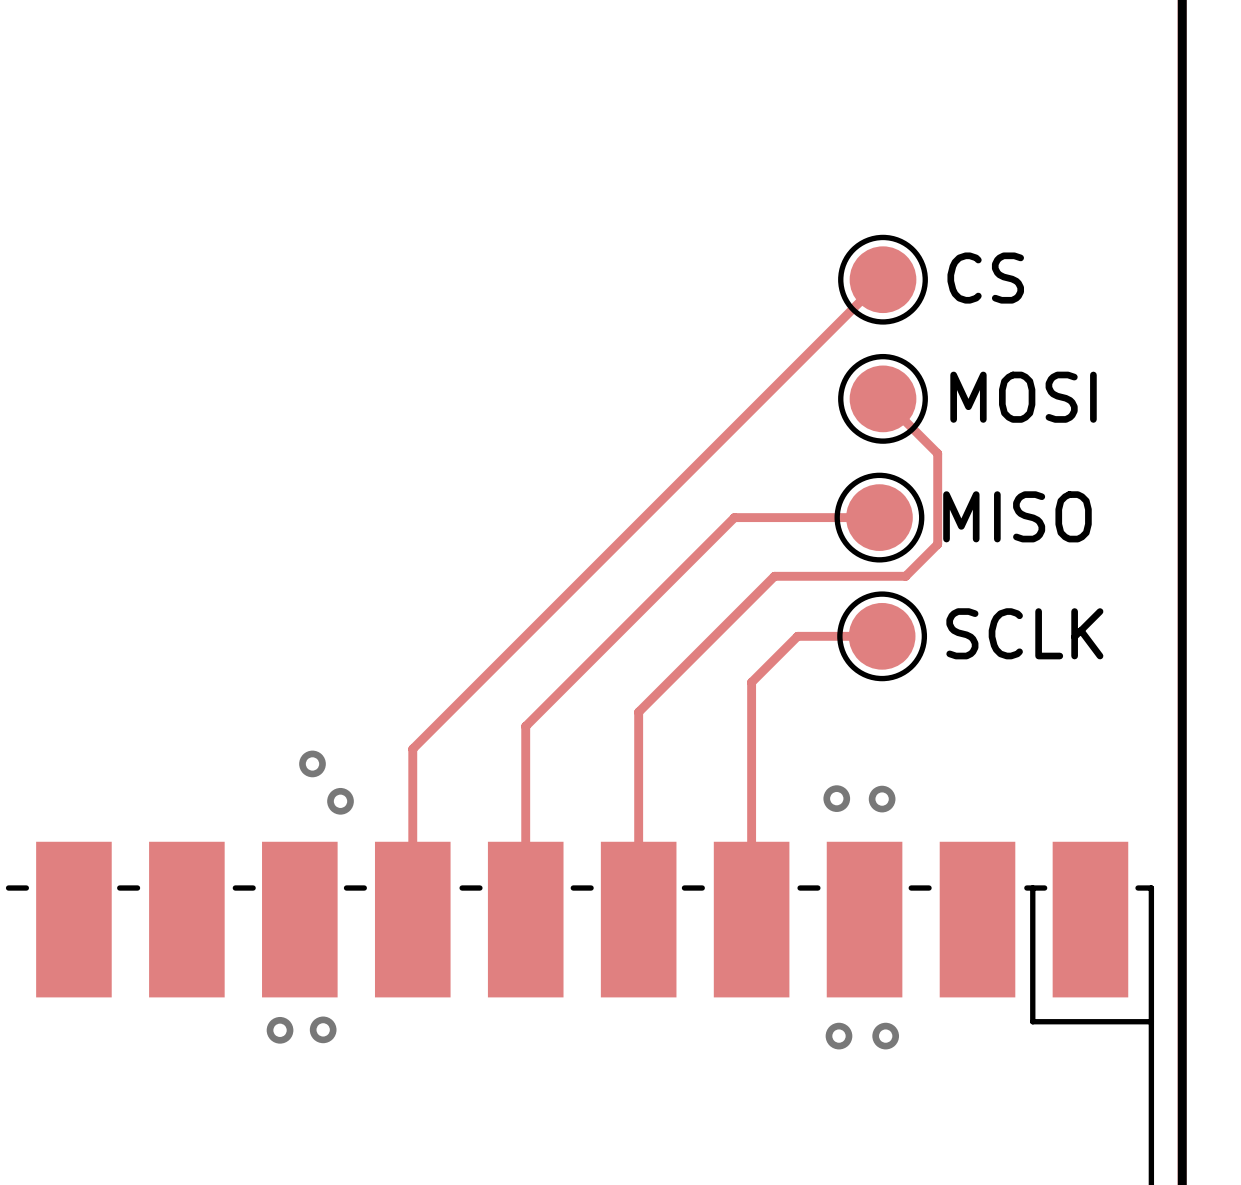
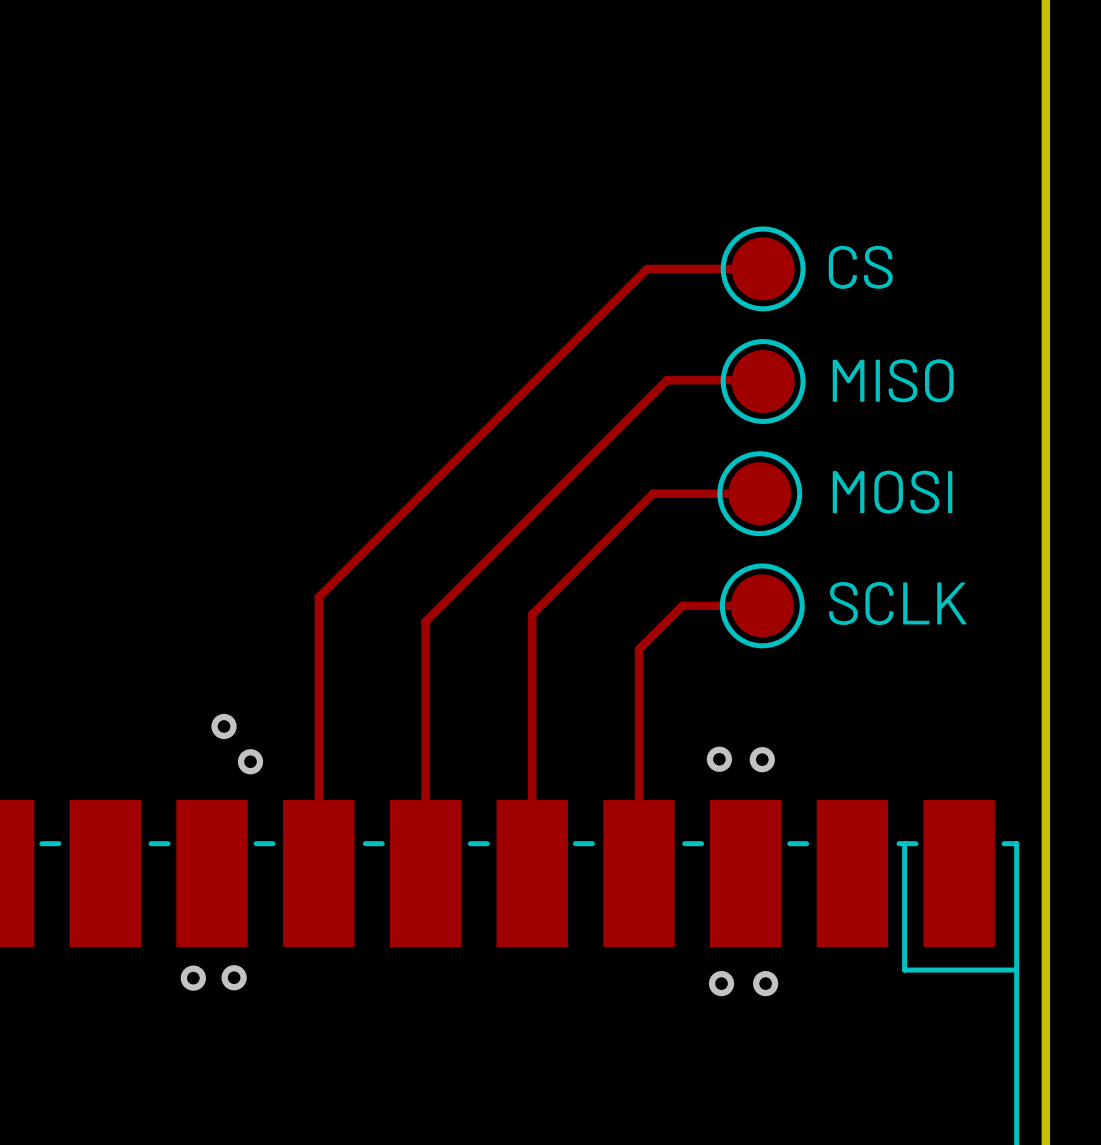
track: (882, 279) (412, 749) -> (762, 268) (647, 268) (318, 597) (318, 712)
part text: MOSI (1023, 397) -> none
track: (883, 398) (937, 453) (937, 544) (905, 576) (774, 576) (638, 712) -> (763, 380) (666, 380) (425, 621) (425, 690)
part text: none -> MISO (893, 380)
part text: none -> MOSI (892, 492)
part text: MISO (1017, 516) -> none
track: (766, 517) (734, 517) (525, 726) -> (653, 493) (532, 614) (532, 677)

